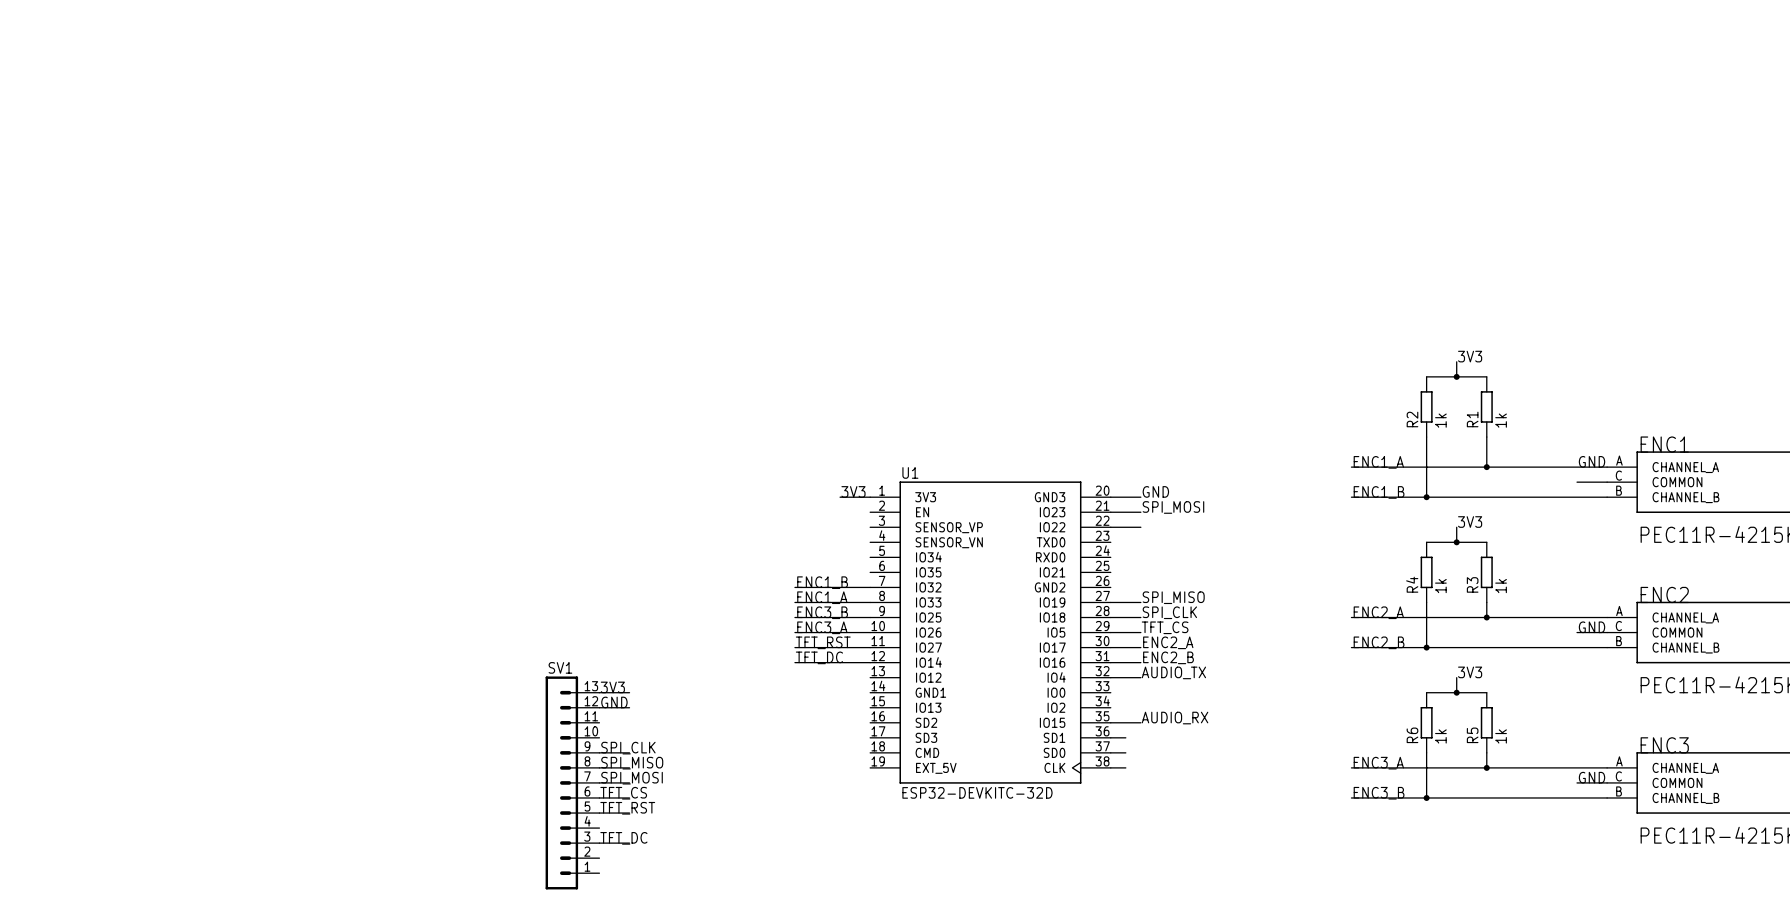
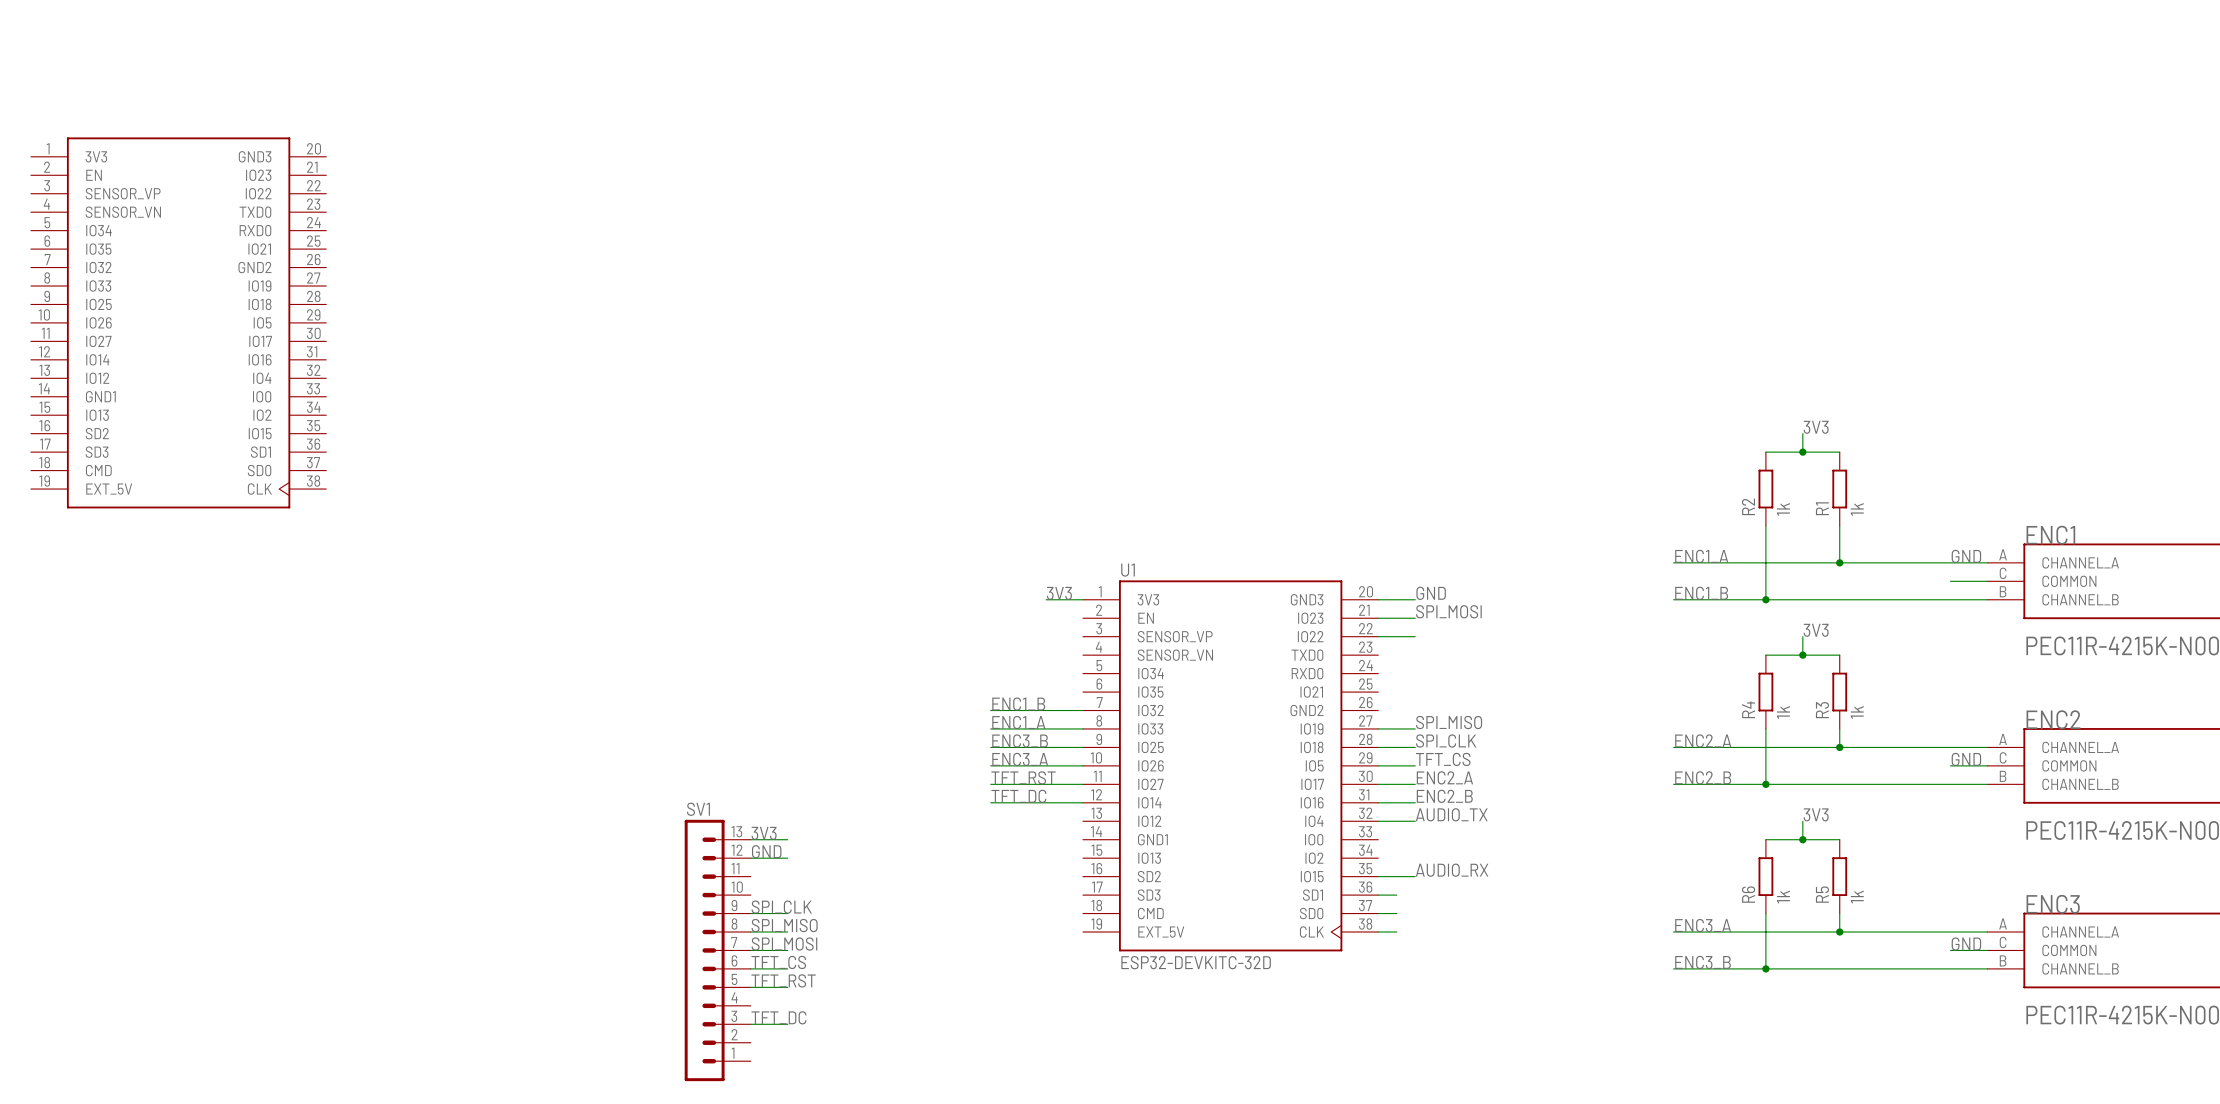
part: none -> (178, 322)

